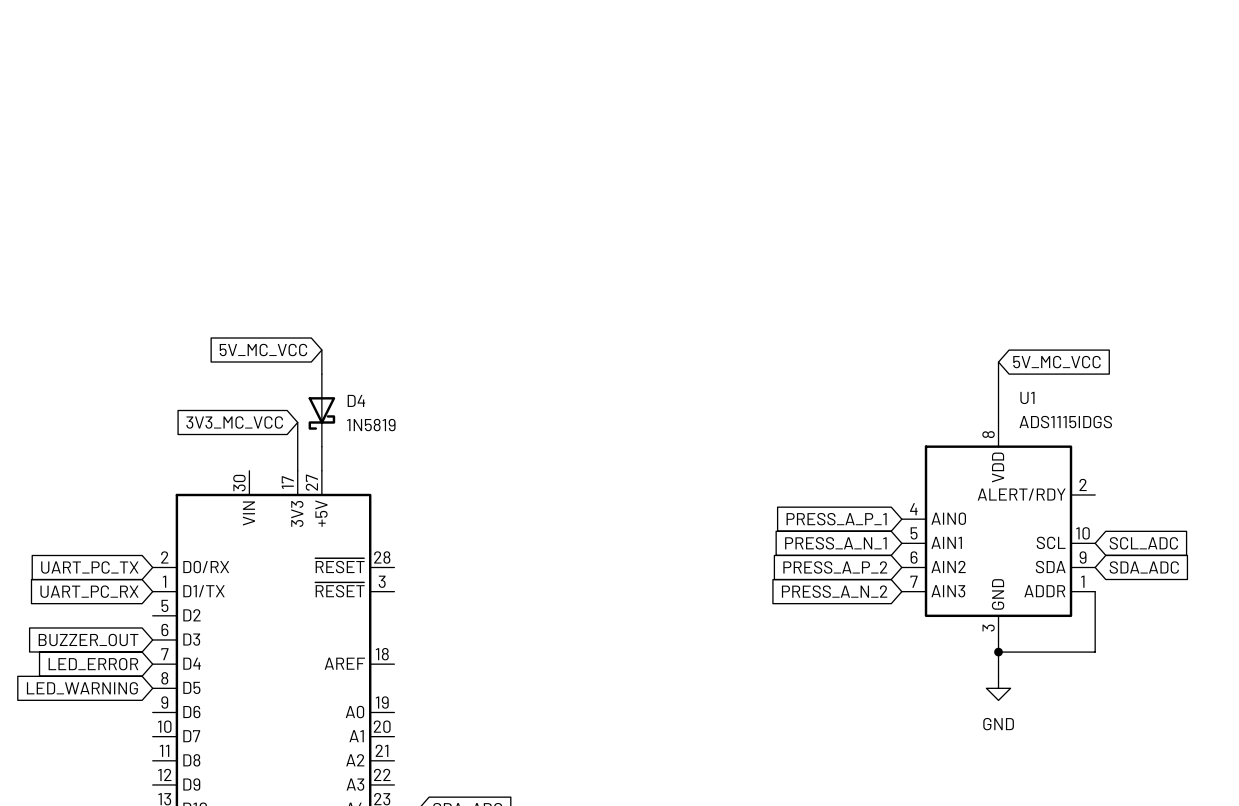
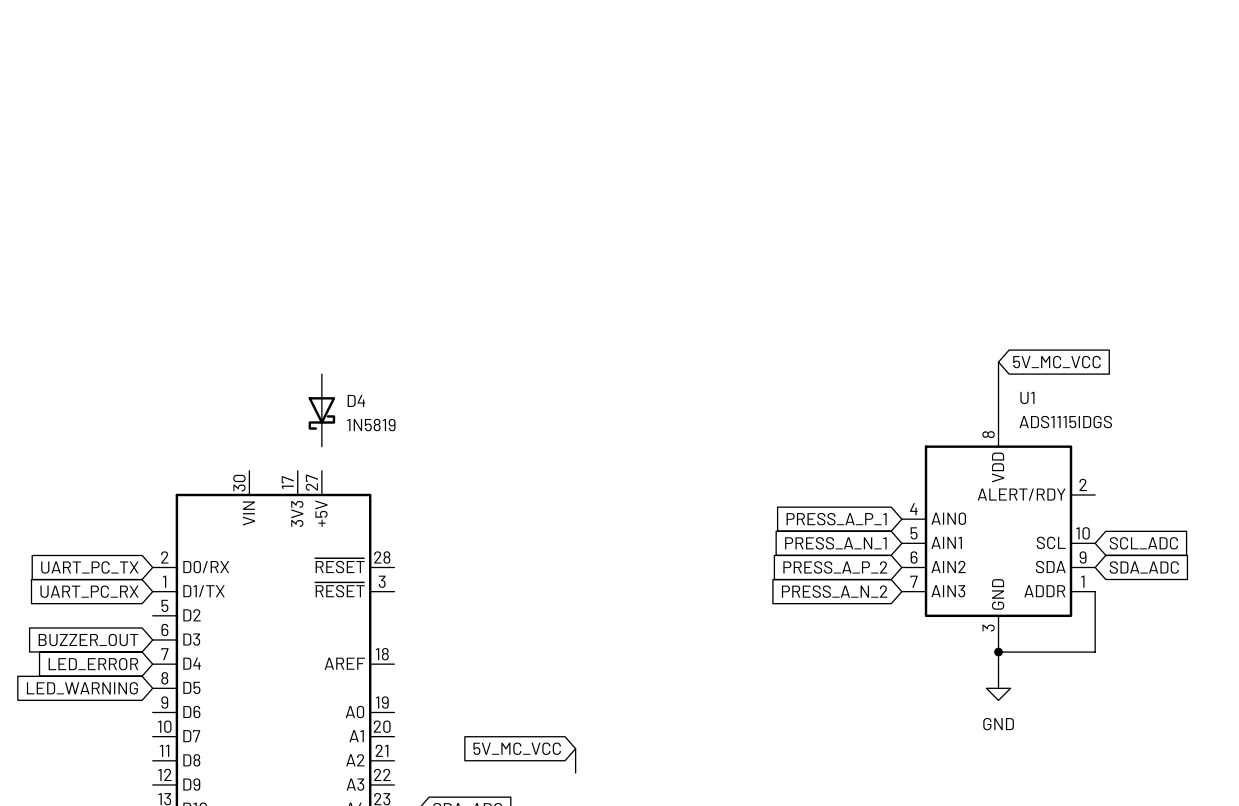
global label: 5V_MC_VCC (263, 350) -> none
wire: (321, 350) (321, 374) -> none
global label: 3V3_MC_VCC (234, 422) -> none
wire: (297, 422) (297, 470) -> none
wire: (321, 446) (321, 470) -> none
global label: none -> 5V_MC_VCC (517, 748)
wire: none -> (575, 748) (575, 772)

